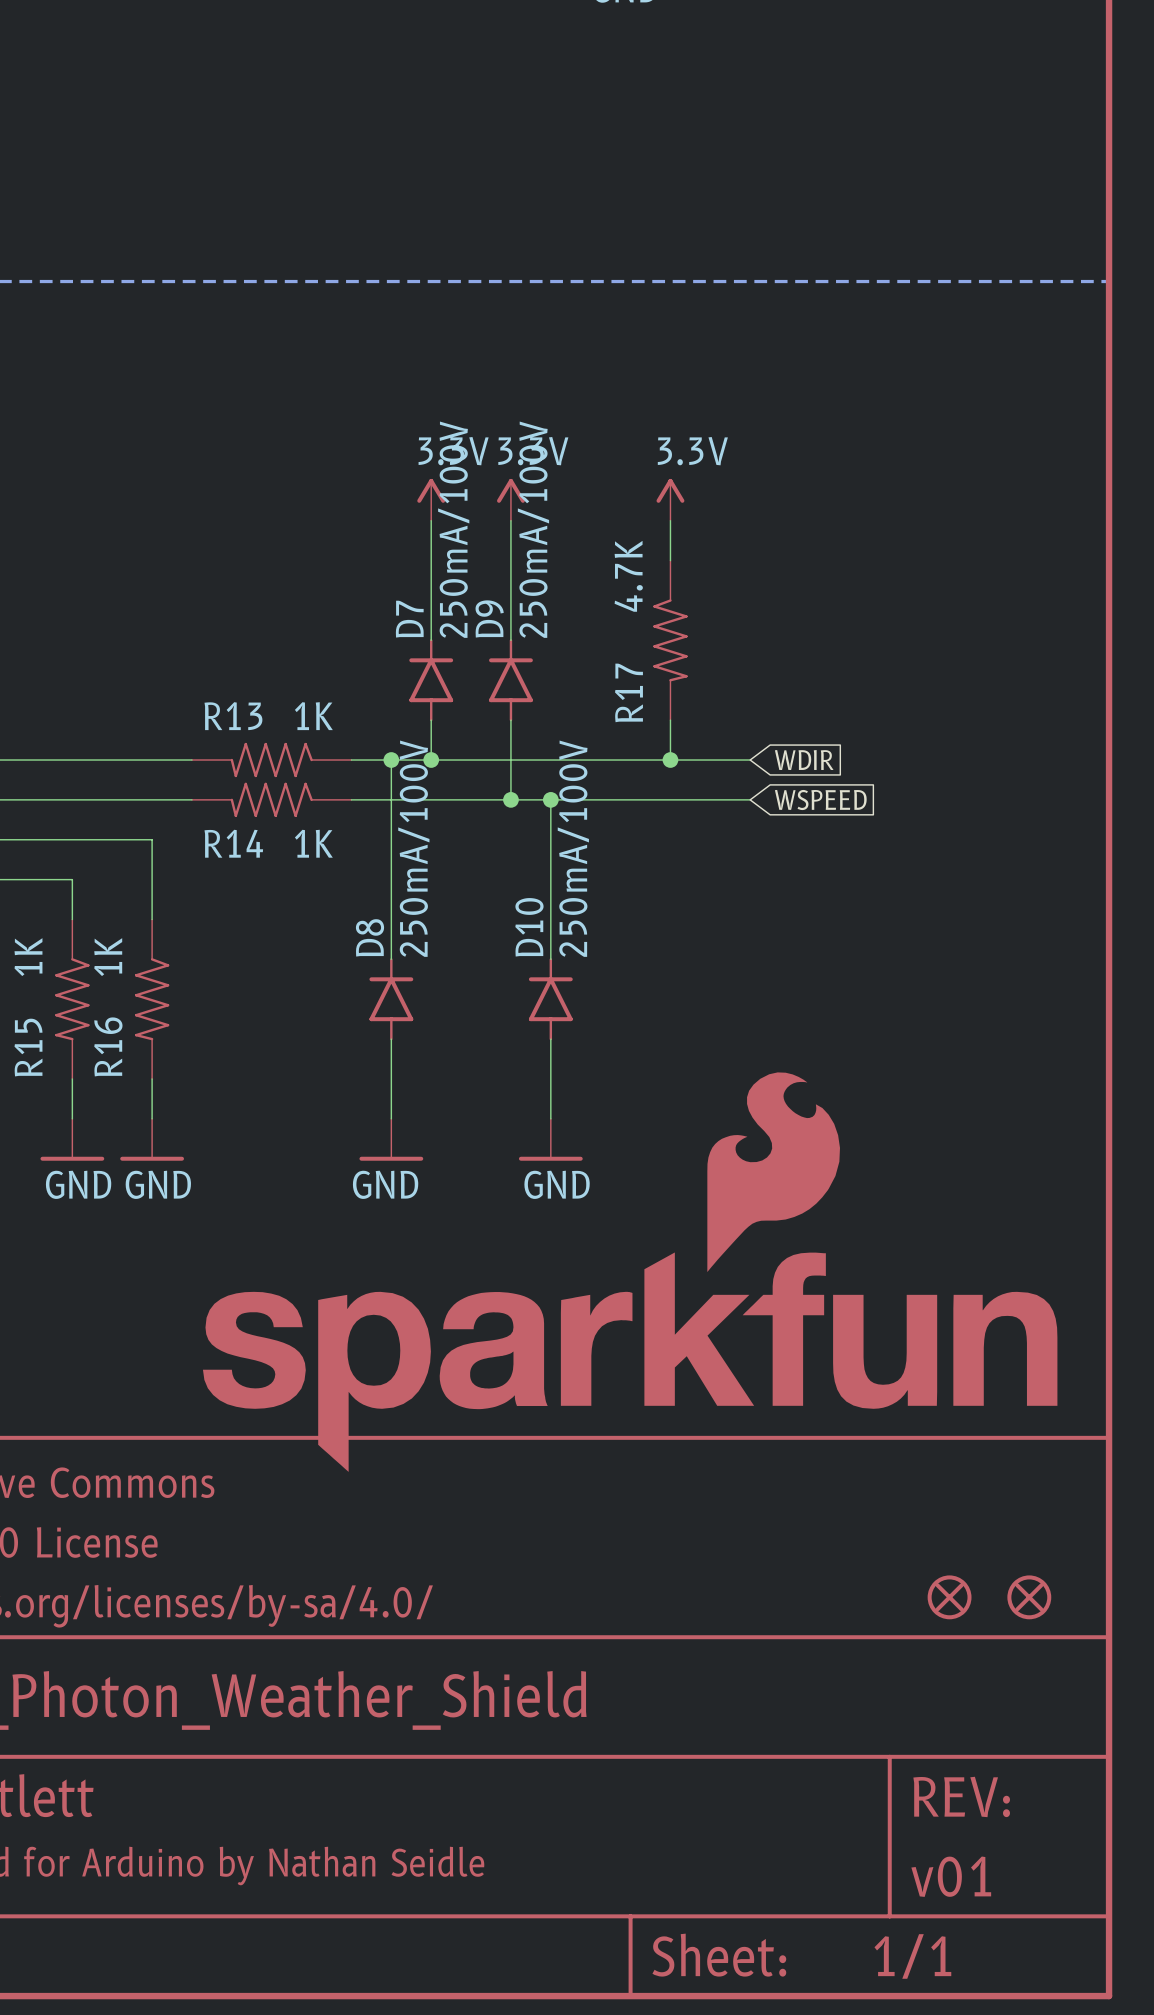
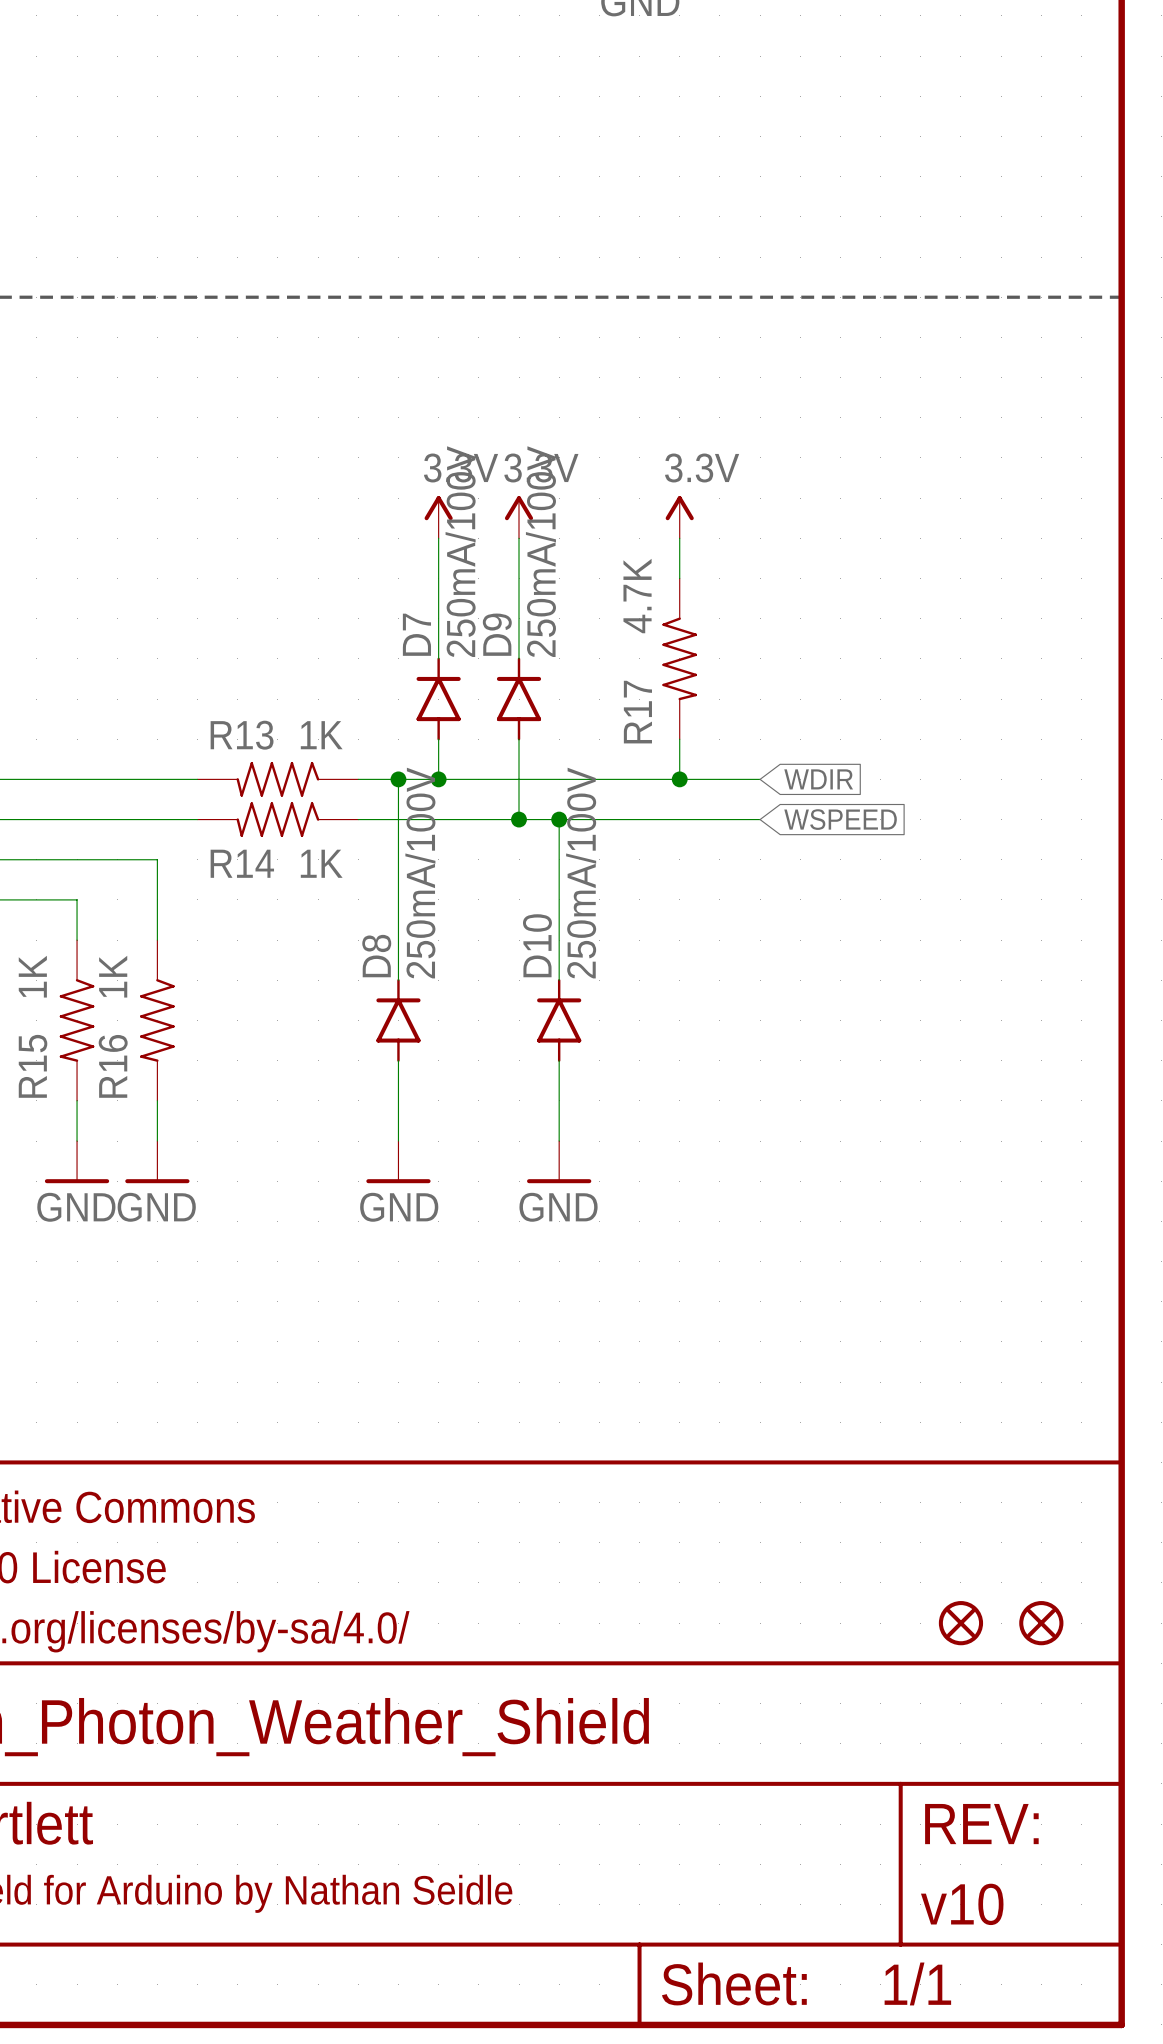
part: (630, 1272) -> none
part text: v01 (951, 1876) -> v10 (962, 1904)

